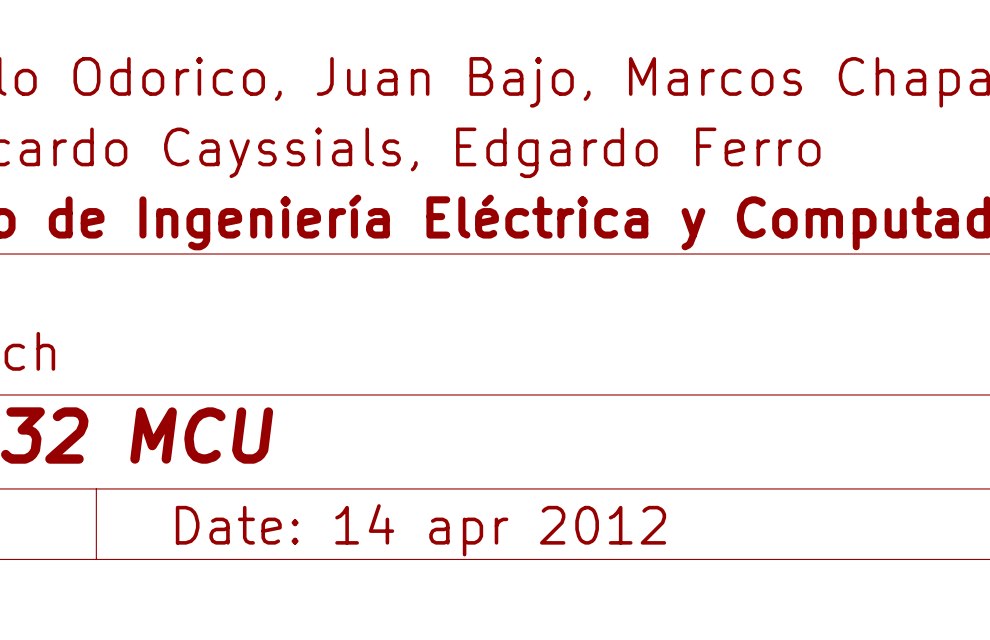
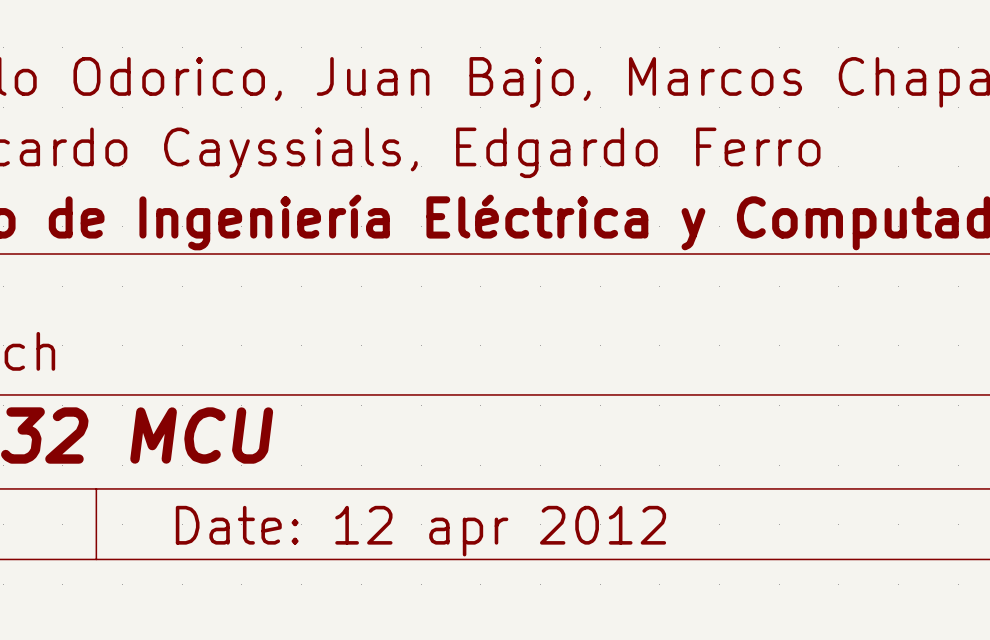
title block: Date: 14 apr 2012 (420, 530) -> Date: 12 apr 2012 (420, 531)

